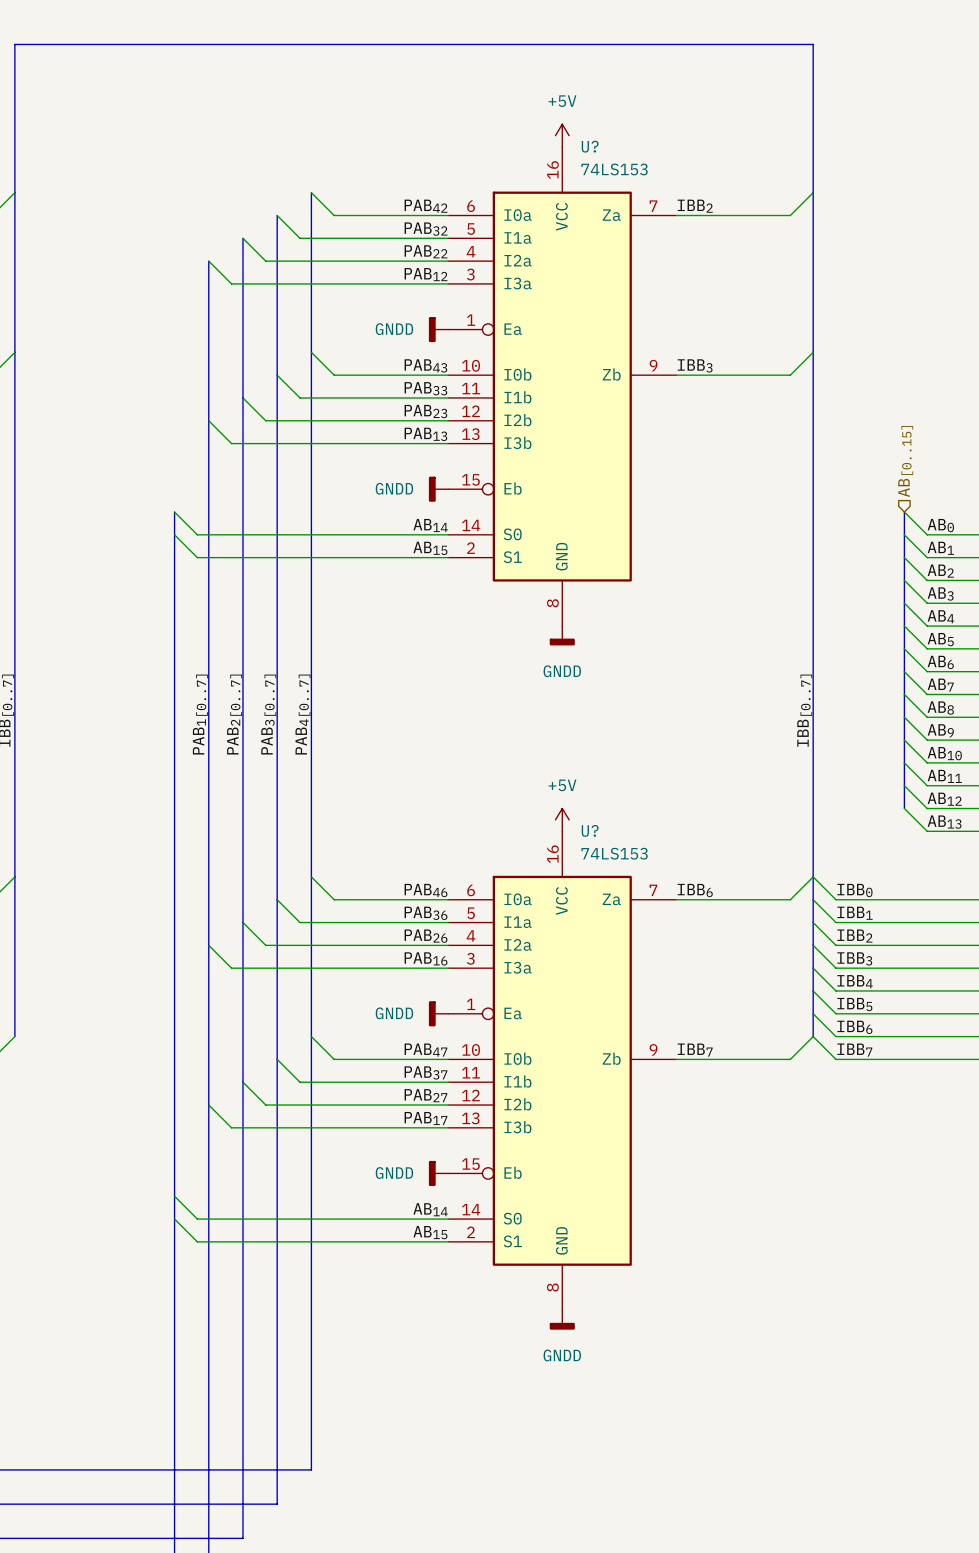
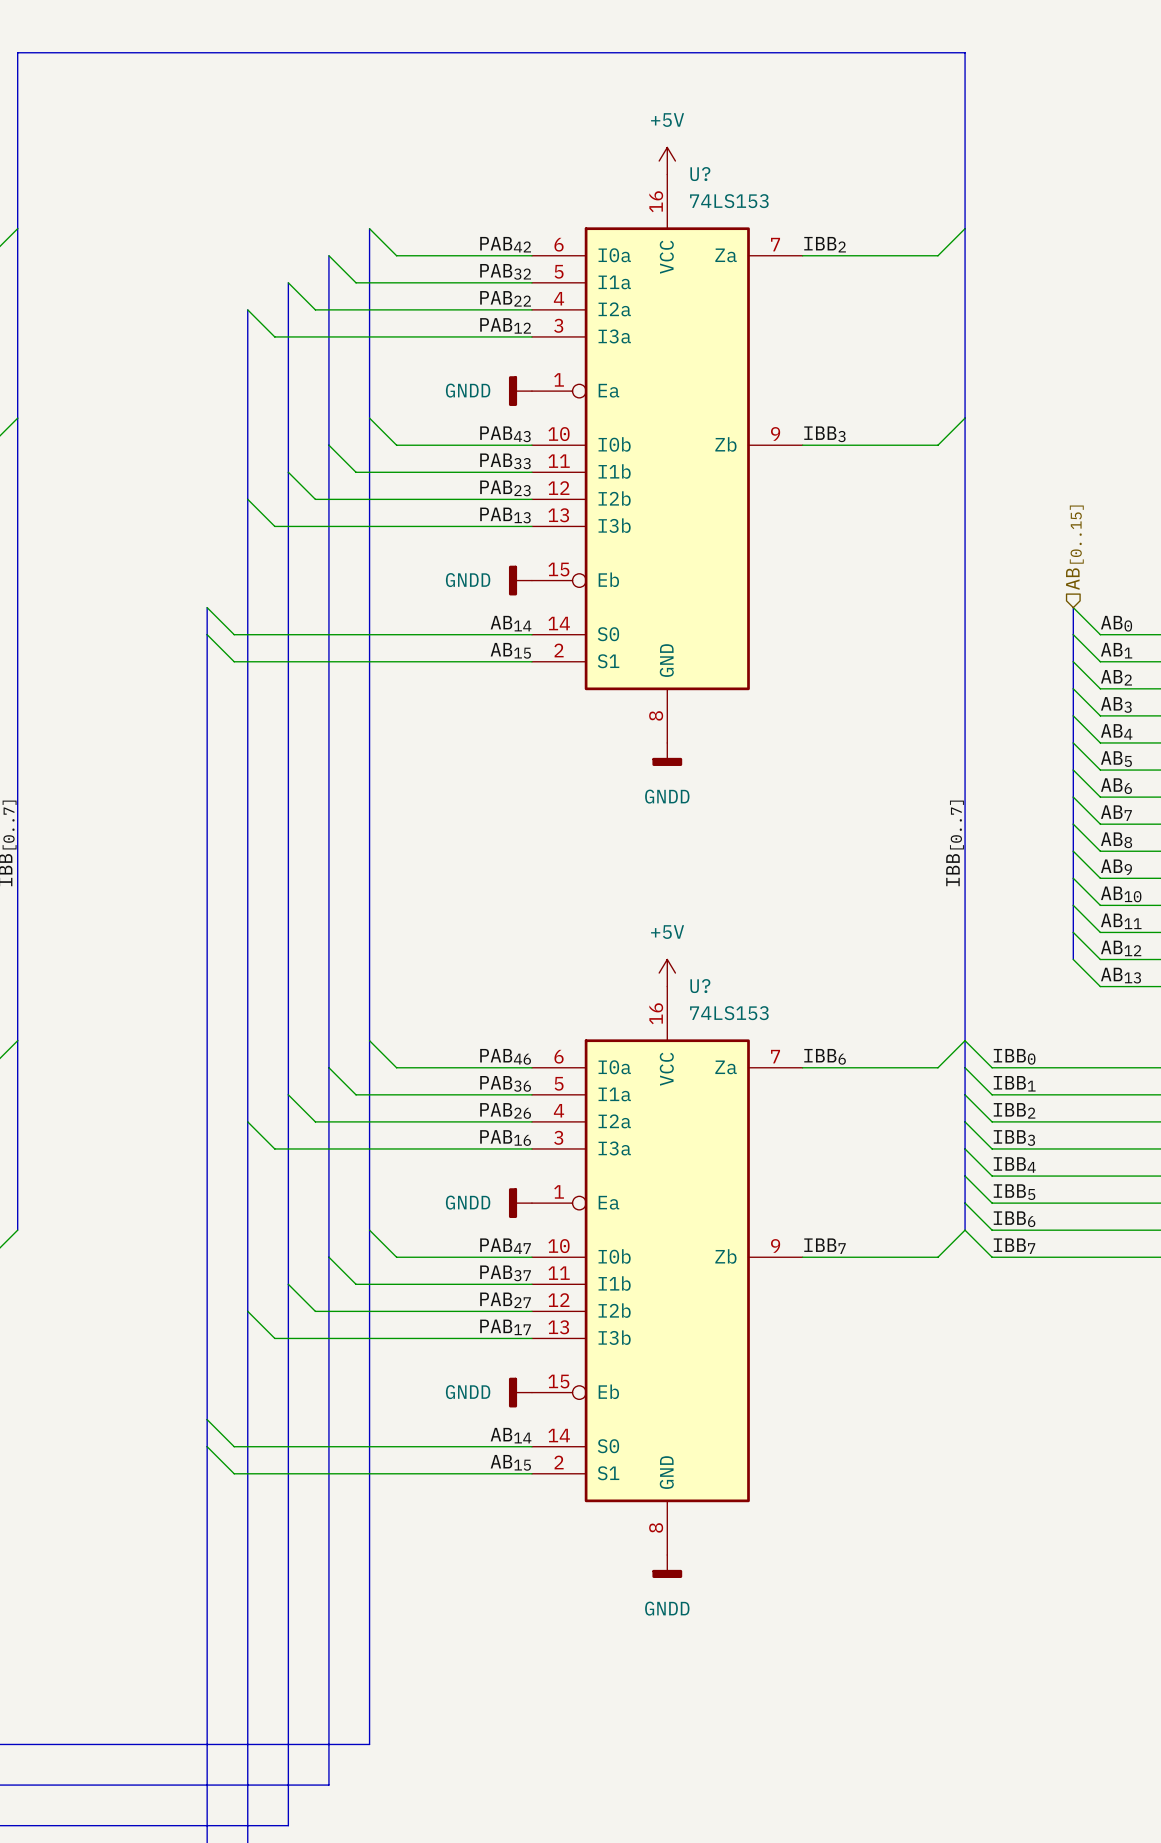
label: PAB1[0..7] (200, 714) -> none
label: PAB2[0..7] (234, 714) -> none
label: PAB3[0..7] (268, 714) -> none
label: PAB4[0..7] (302, 714) -> none

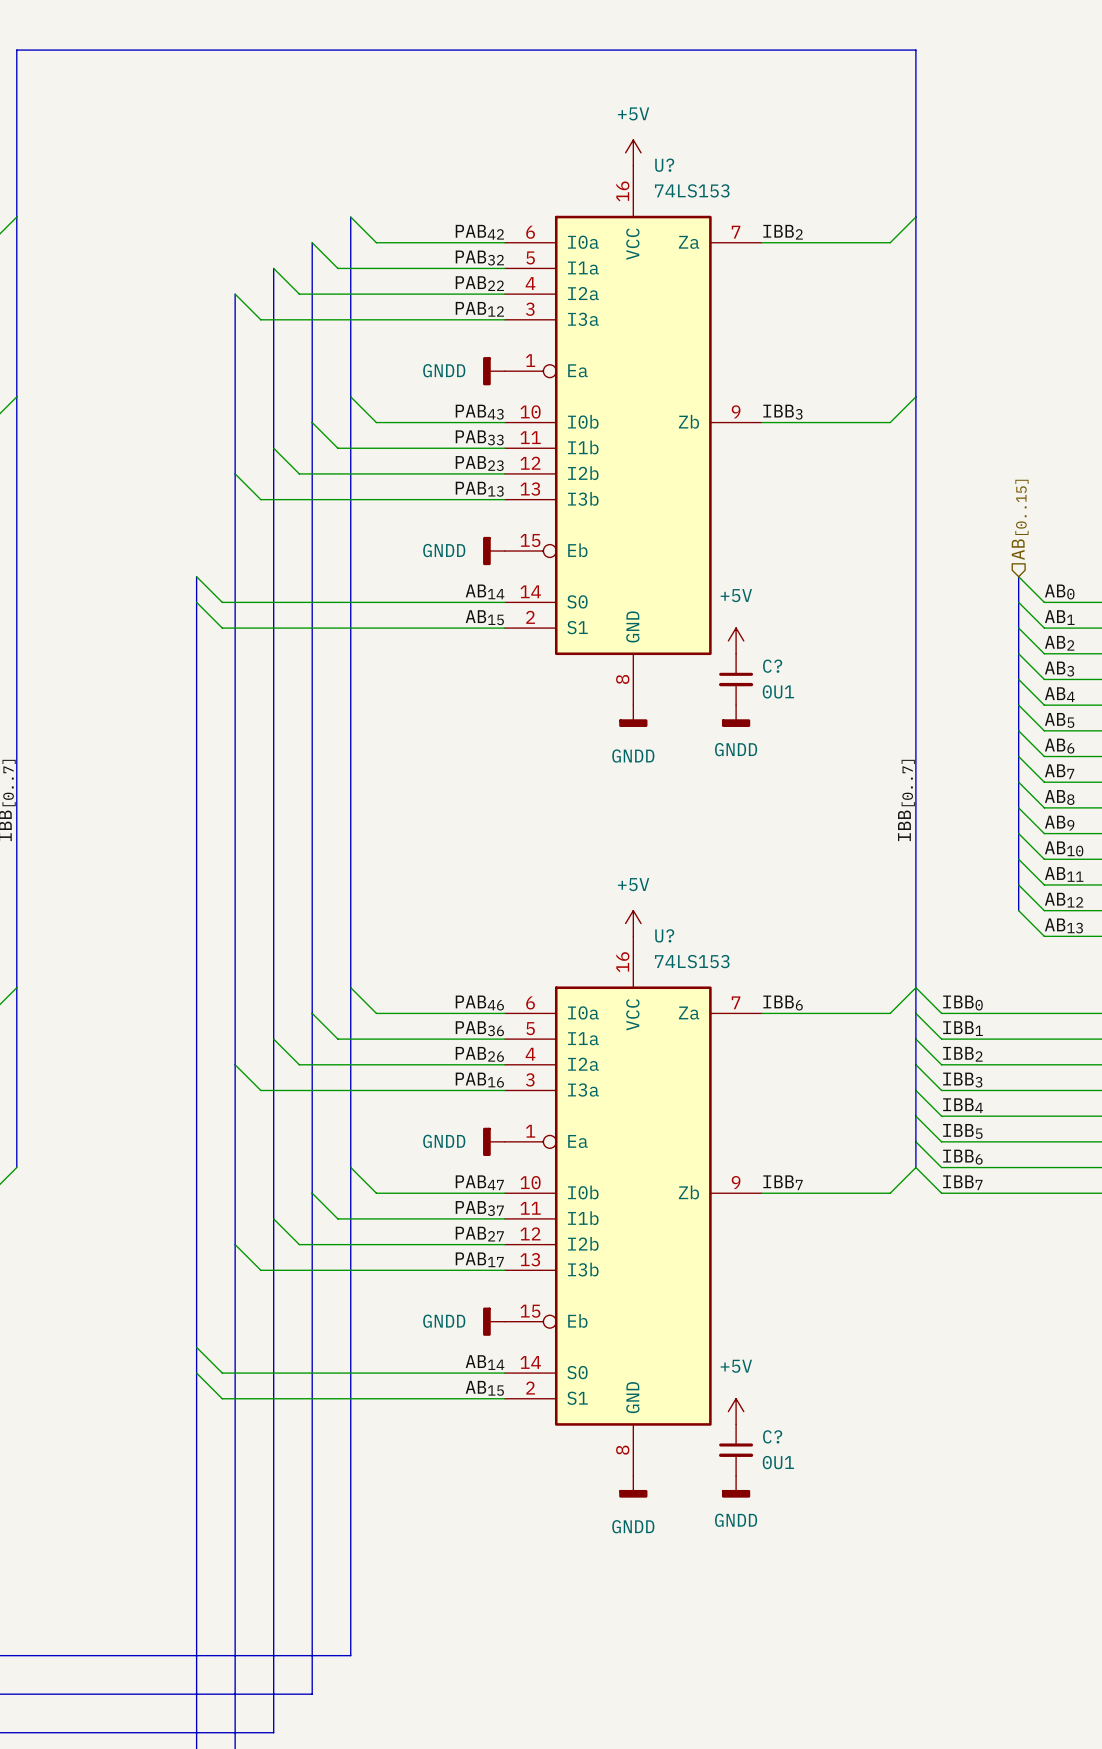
power symbol: none -> +5V (736, 640)
C?: none -> 0U1 (736, 679)
power symbol: none -> GNDD (736, 716)
power symbol: none -> +5V (736, 1411)
C?: none -> 0U1 (736, 1450)
power symbol: none -> GNDD (736, 1486)

